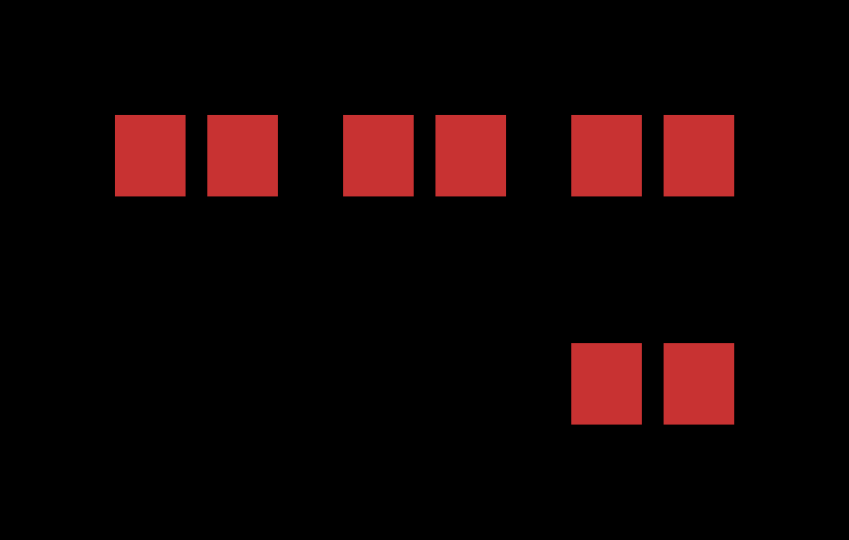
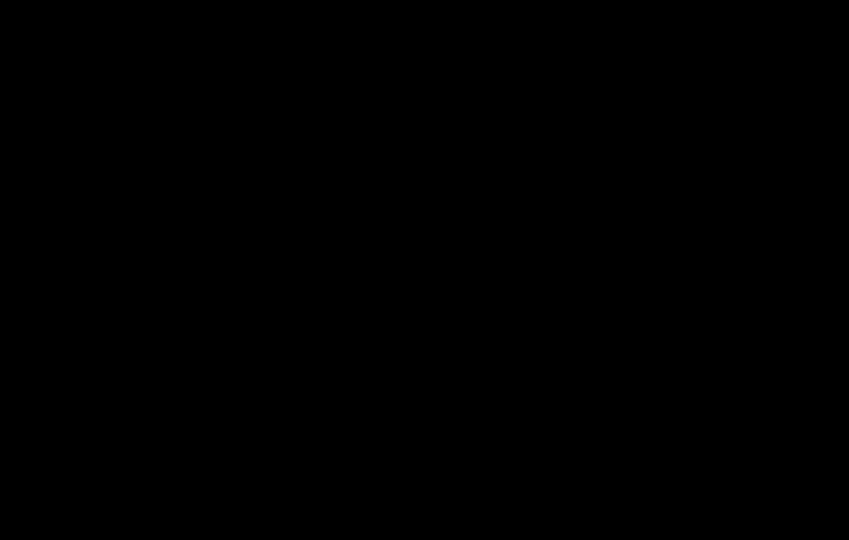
part: (196, 155) -> none
part: (424, 155) -> none
part: (652, 155) -> none
part: (652, 383) -> none

